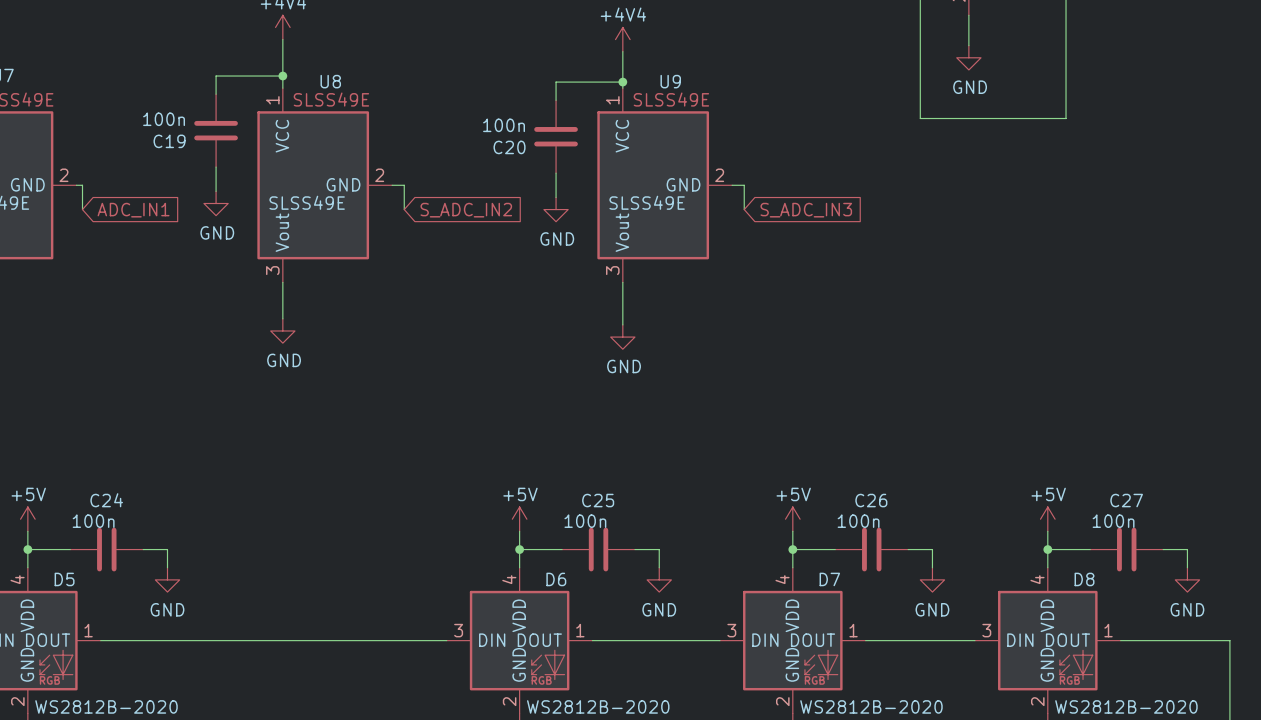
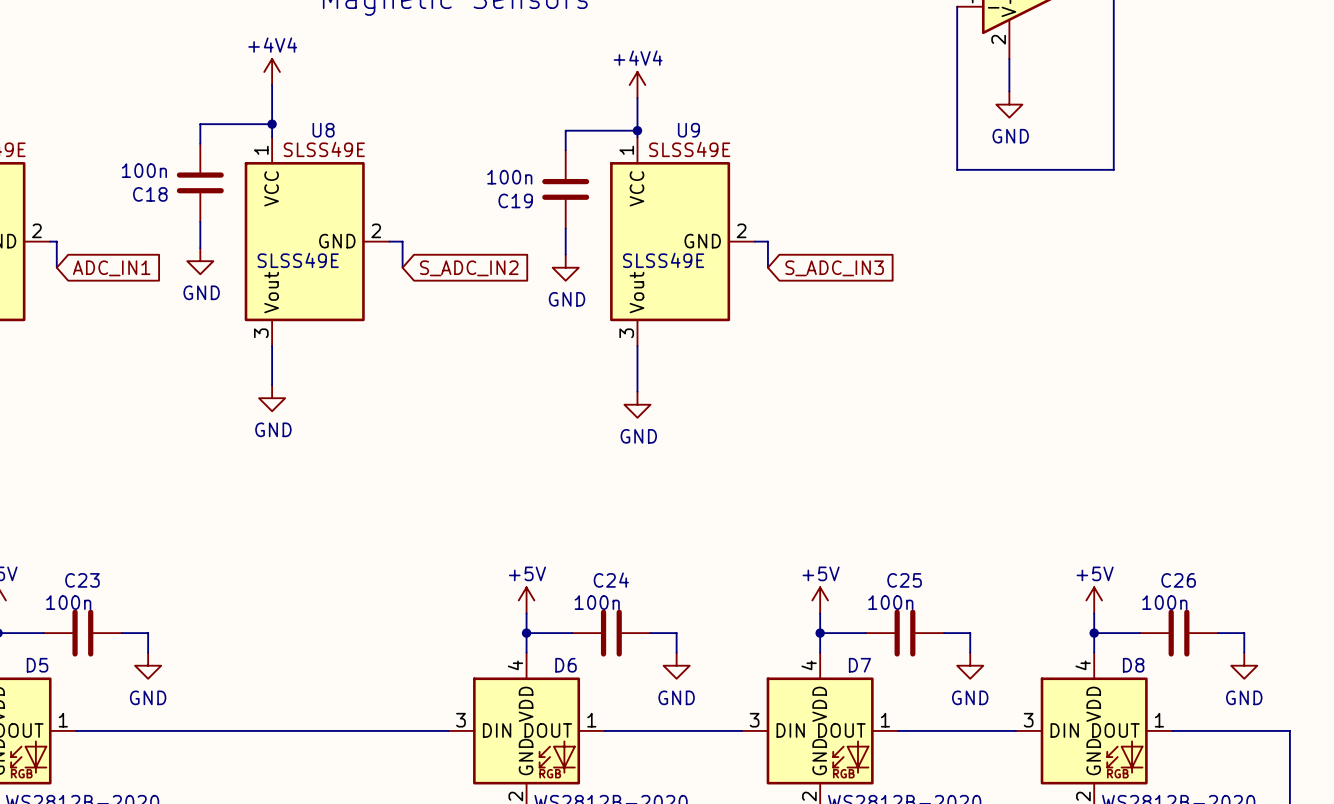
C19 name: C19 (169, 141) -> C18 (150, 194)
C20 name: C20 (509, 147) -> C19 (515, 200)
C24 name: C24 (106, 500) -> C23 (82, 580)
C25 name: C25 (598, 500) -> C24 (611, 580)
C26 name: C26 (871, 500) -> C25 (904, 580)
C27 name: C27 (1126, 500) -> C26 (1178, 580)

